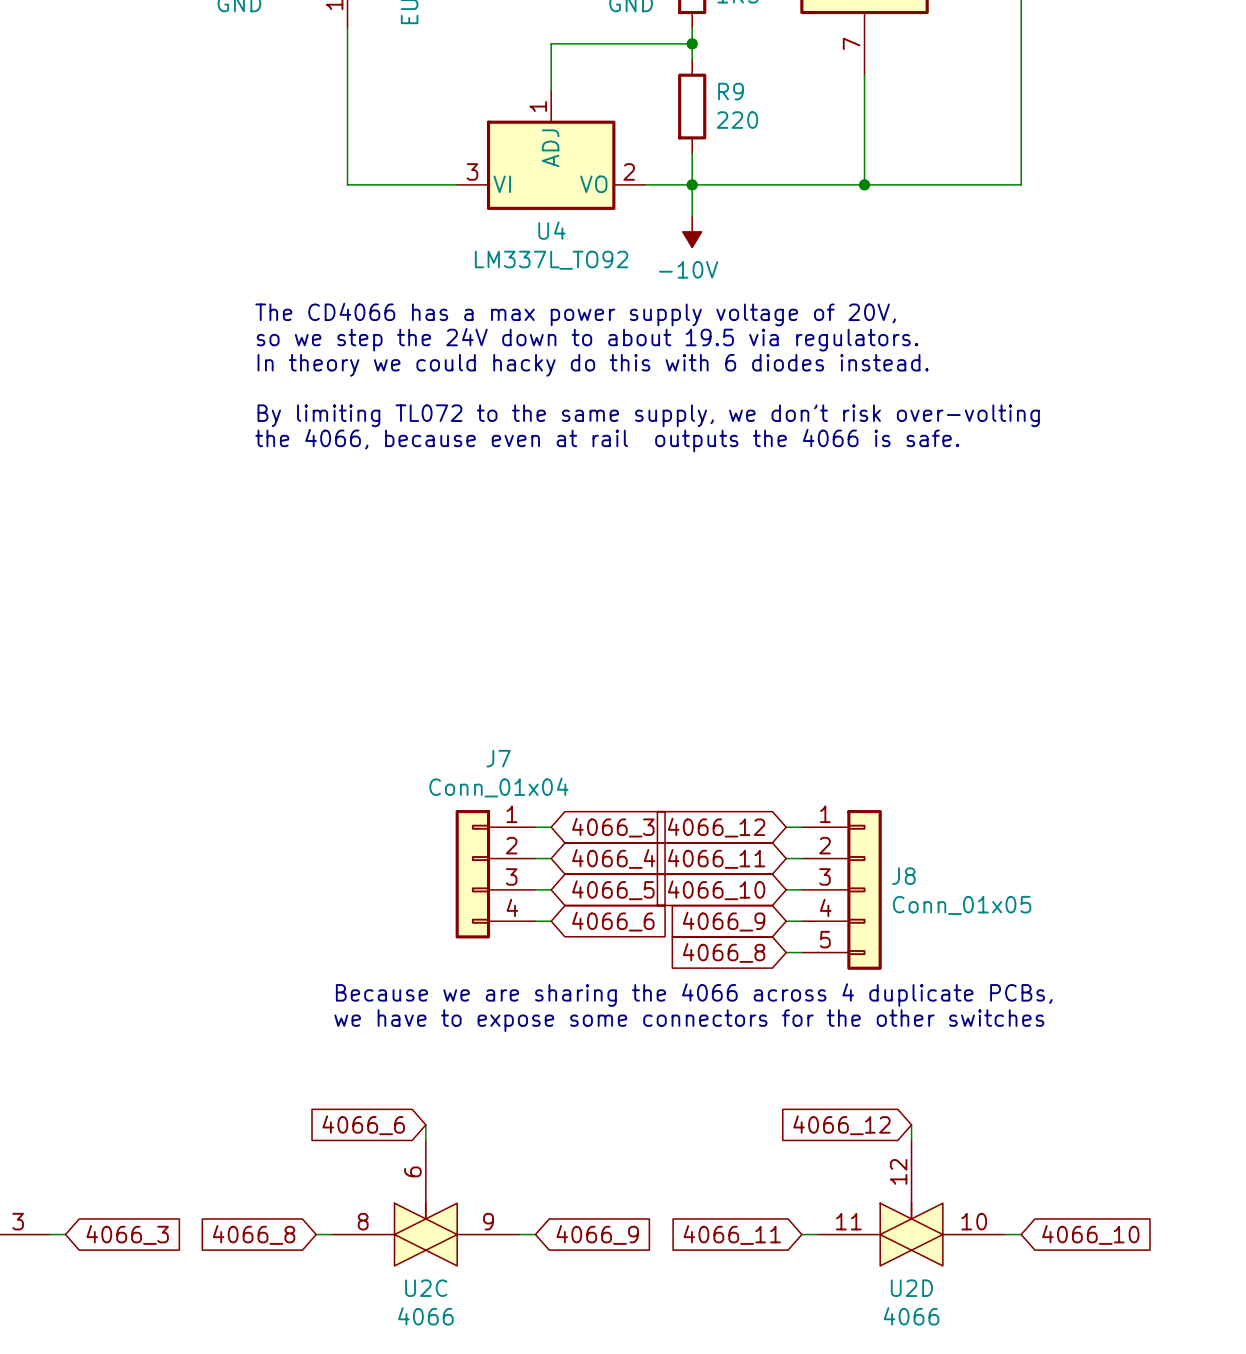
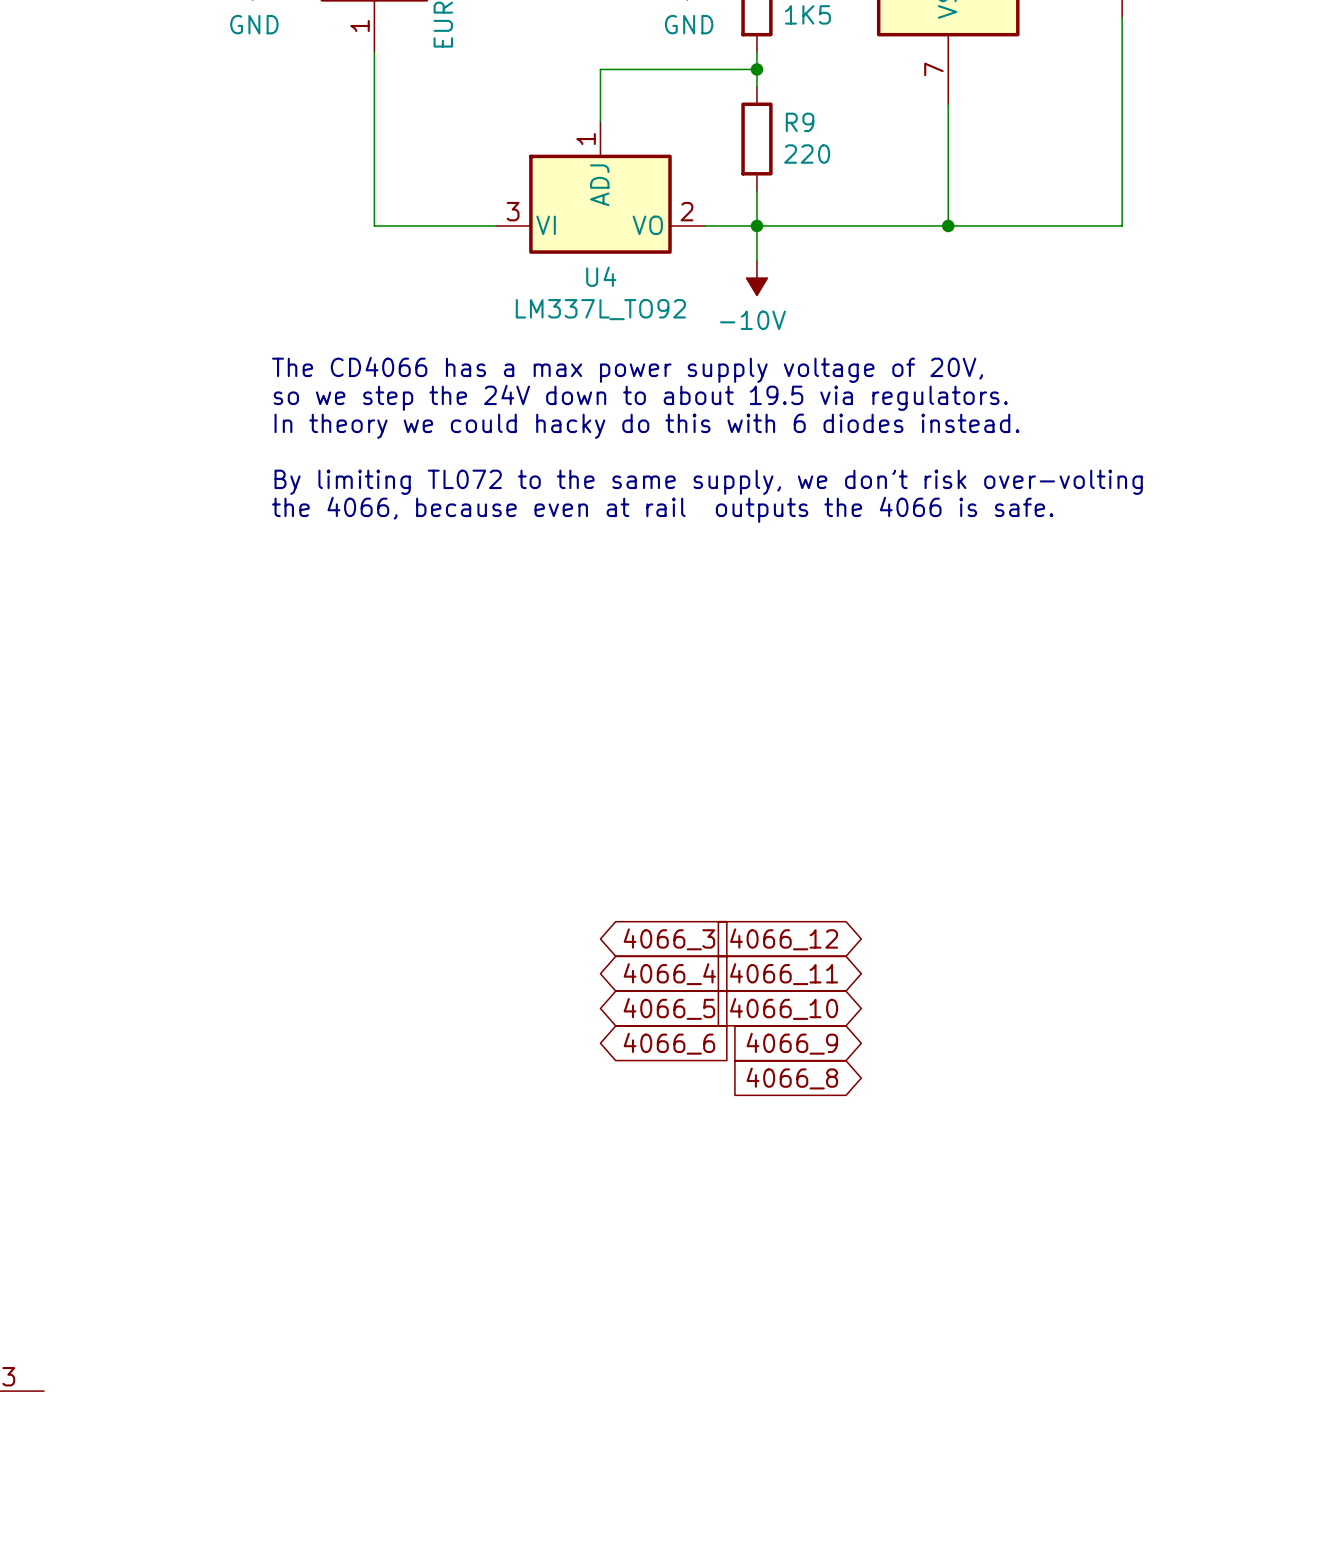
wire: (535, 827) (551, 827) -> none
wire: (786, 827) (801, 827) -> none
wire: (535, 858) (551, 858) -> none
wire: (786, 858) (801, 858) -> none
J7: Conn_01x04 (495, 874) -> none
wire: (535, 889) (551, 889) -> none
wire: (786, 889) (801, 889) -> none
J8: Conn_01x05 (841, 889) -> none
wire: (535, 921) (551, 921) -> none
wire: (786, 921) (801, 921) -> none
wire: (786, 952) (801, 952) -> none
text: Because we are sharing the 4066 across 4 duplicate PCBs, (694, 995) -> none
text: we have to expose some connectors for the other switches (689, 1020) -> none
wire: (425, 1124) (425, 1140) -> none
wire: (911, 1124) (911, 1140) -> none
global label: 4066_6 (363, 1125) -> none
global label: 4066_12 (841, 1125) -> none
U2C: 4066 (425, 1203) -> none
U2D: 4066 (911, 1203) -> none
wire: (49, 1234) (65, 1234) -> none
global label: 4066_3 (127, 1234) -> none
global label: 4066_8 (254, 1234) -> none
wire: (316, 1234) (331, 1234) -> none
wire: (519, 1234) (535, 1234) -> none
global label: 4066_9 (597, 1234) -> none
global label: 4066_11 (732, 1234) -> none
wire: (801, 1234) (817, 1234) -> none
wire: (1005, 1234) (1021, 1234) -> none
global label: 4066_10 (1090, 1234) -> none

